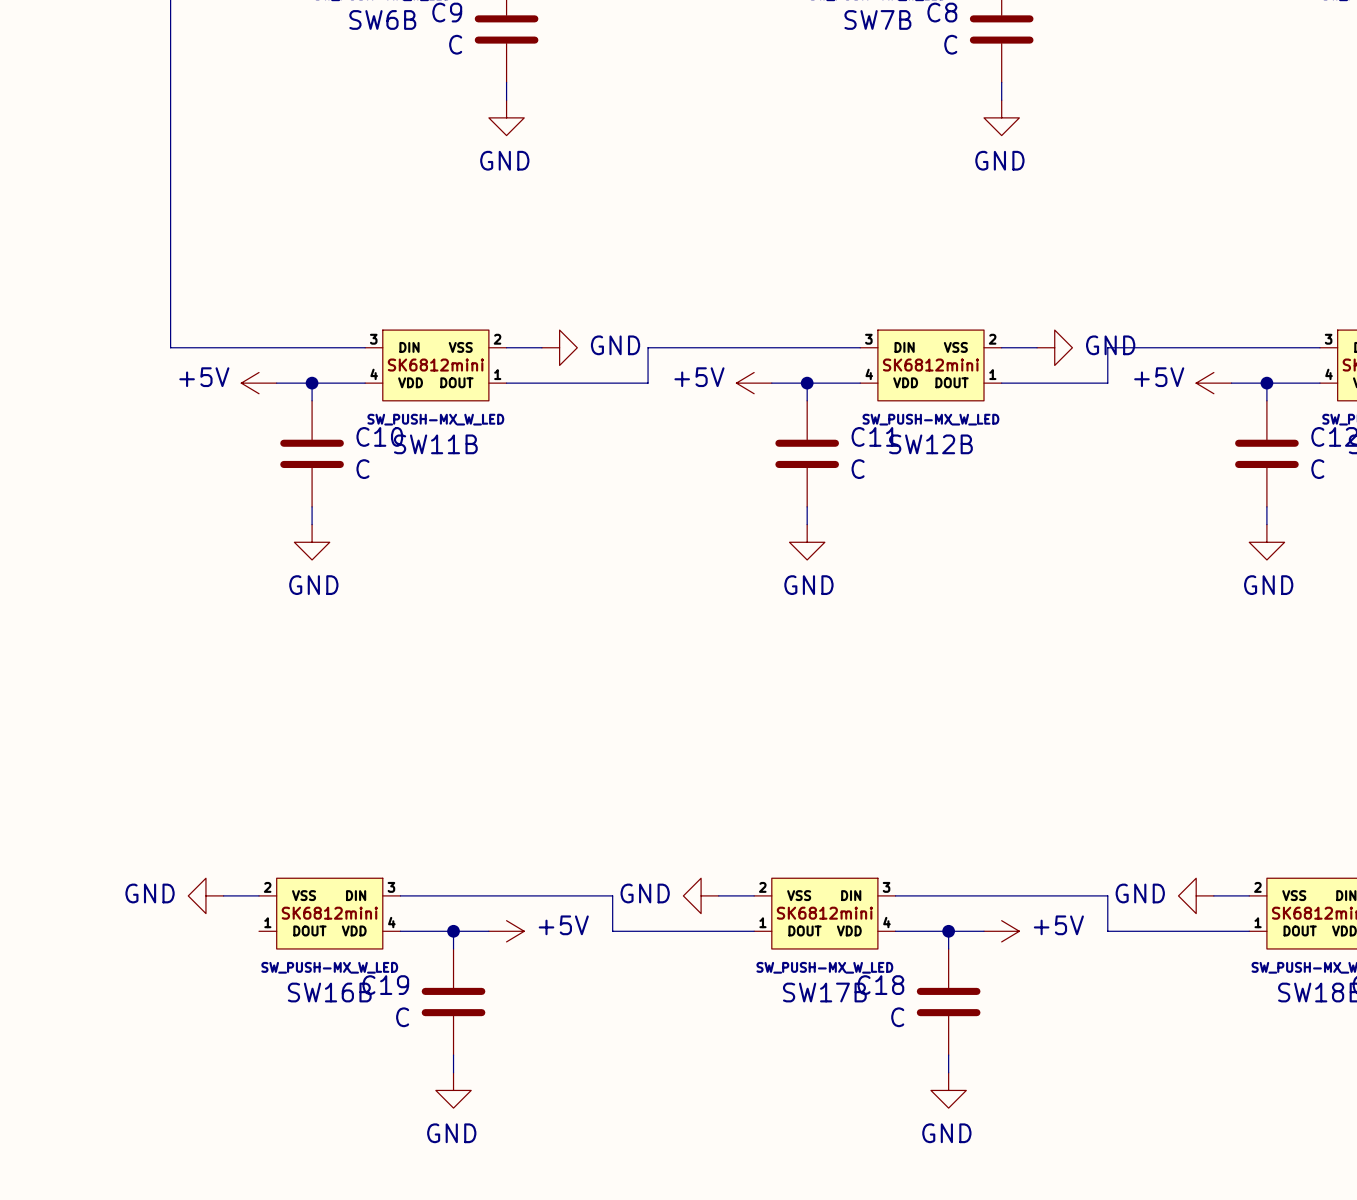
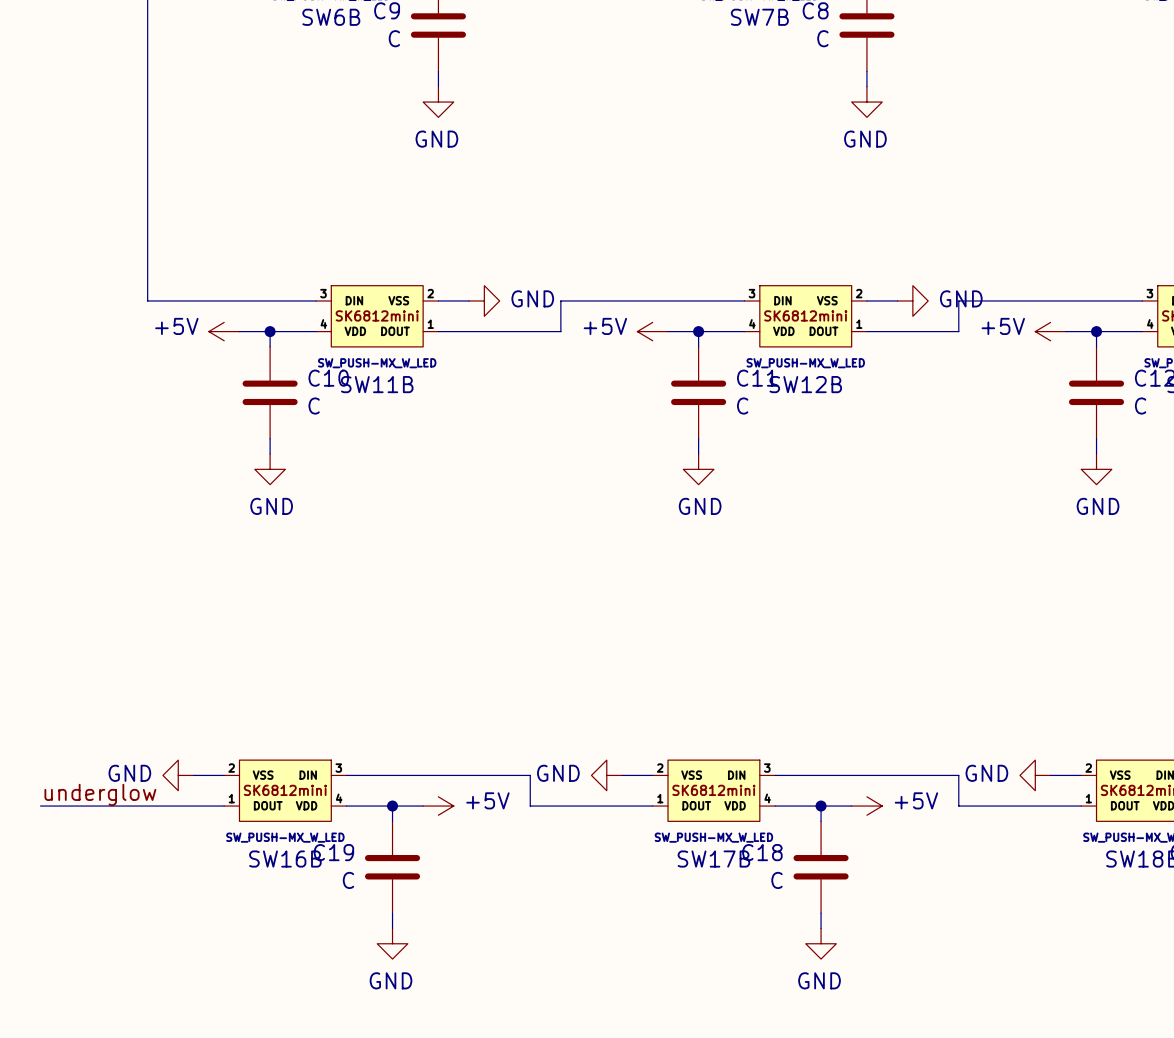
label: none -> underglow (100, 794)
wire: none -> (40, 806) (224, 806)

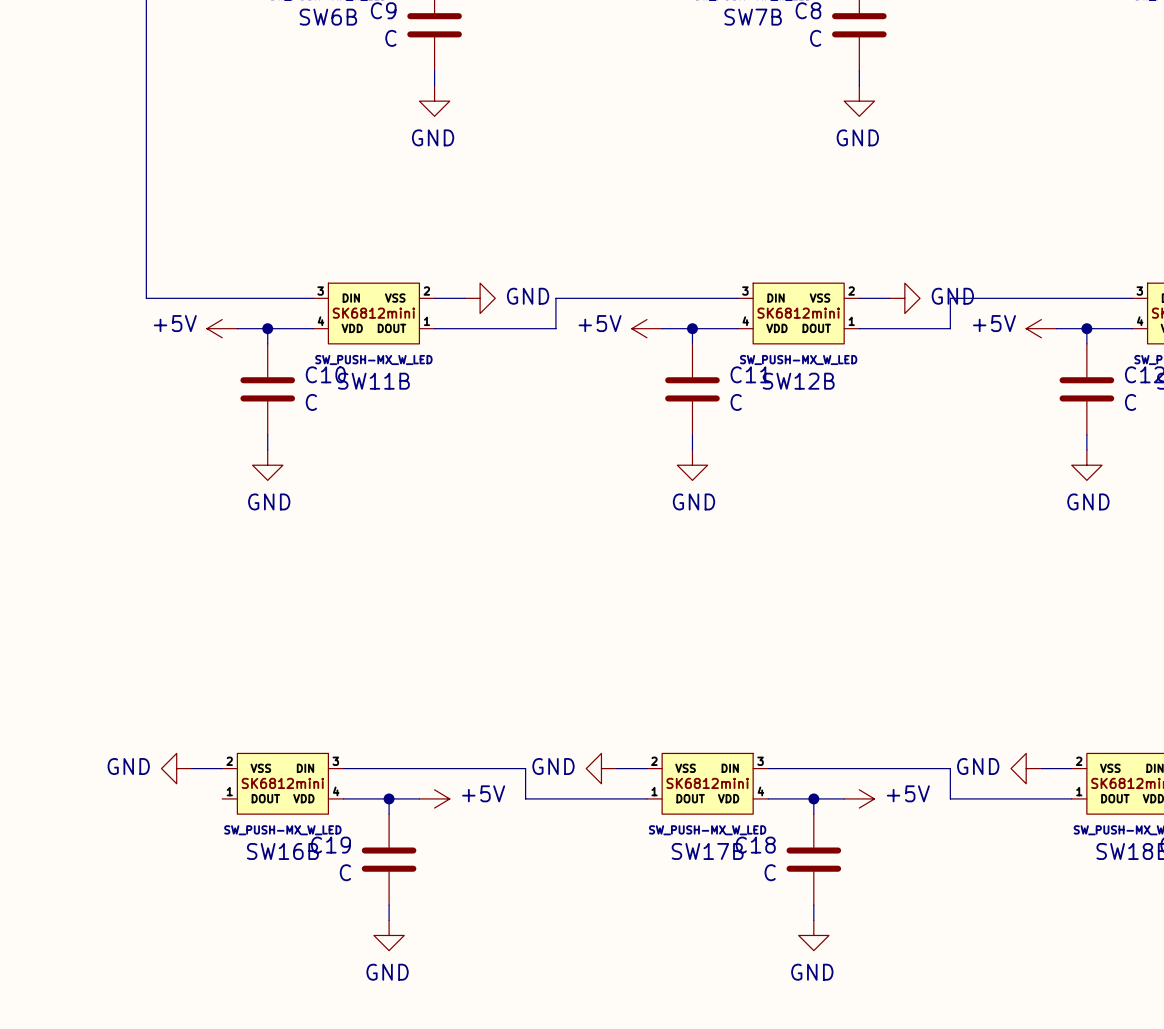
label: underglow (100, 794) -> none
wire: (40, 806) (224, 806) -> none

